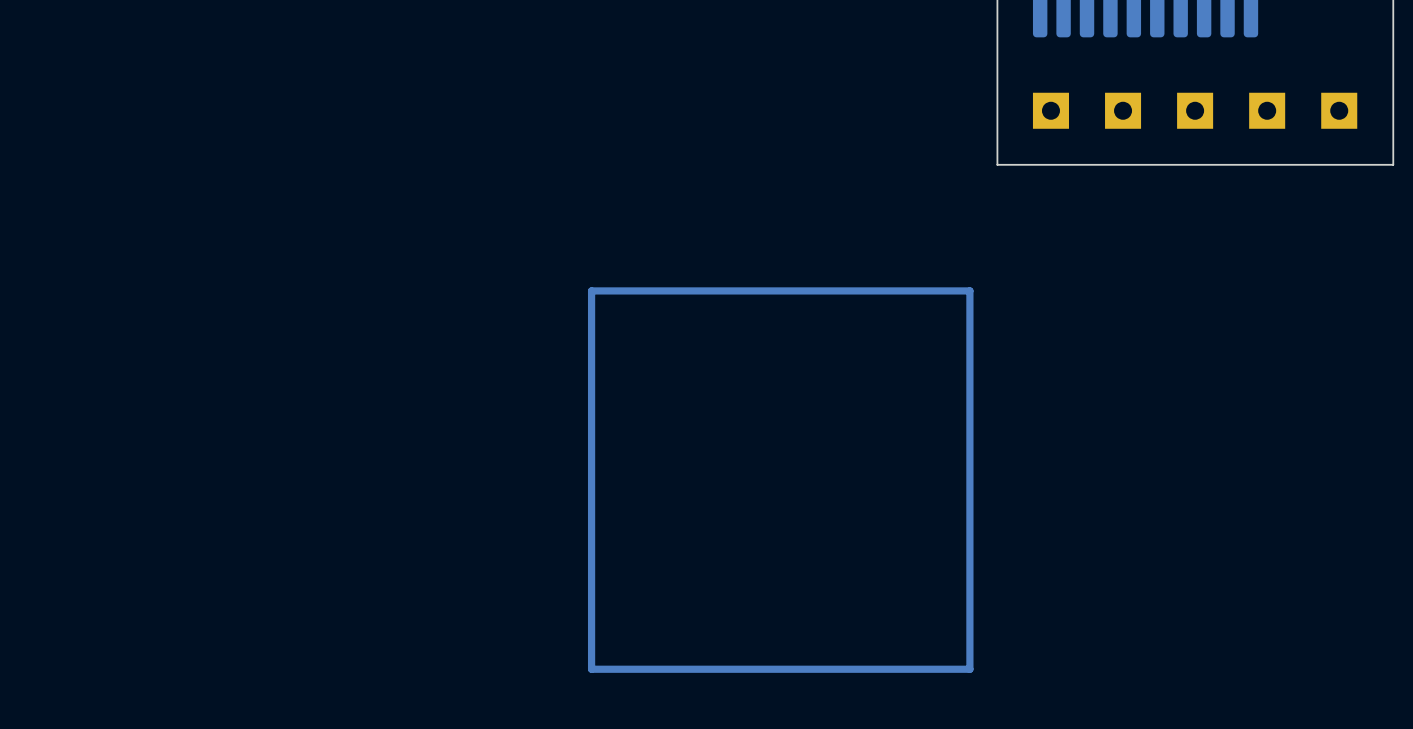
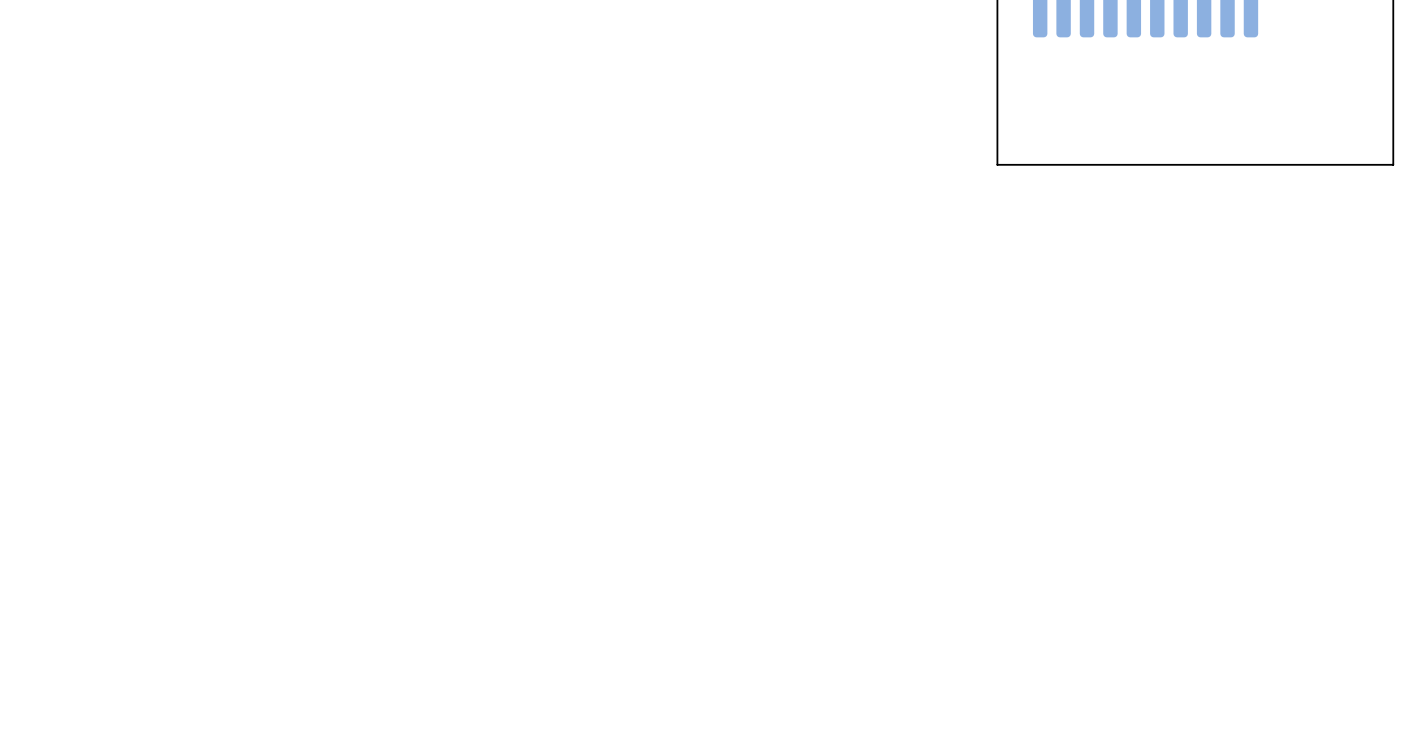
part: (1050, 110) -> none
part: (1123, 110) -> none
part: (1195, 110) -> none
part: (1267, 110) -> none
part: (1339, 110) -> none
track: (969, 290) (591, 290) (591, 669) (969, 669) (969, 290) -> none

